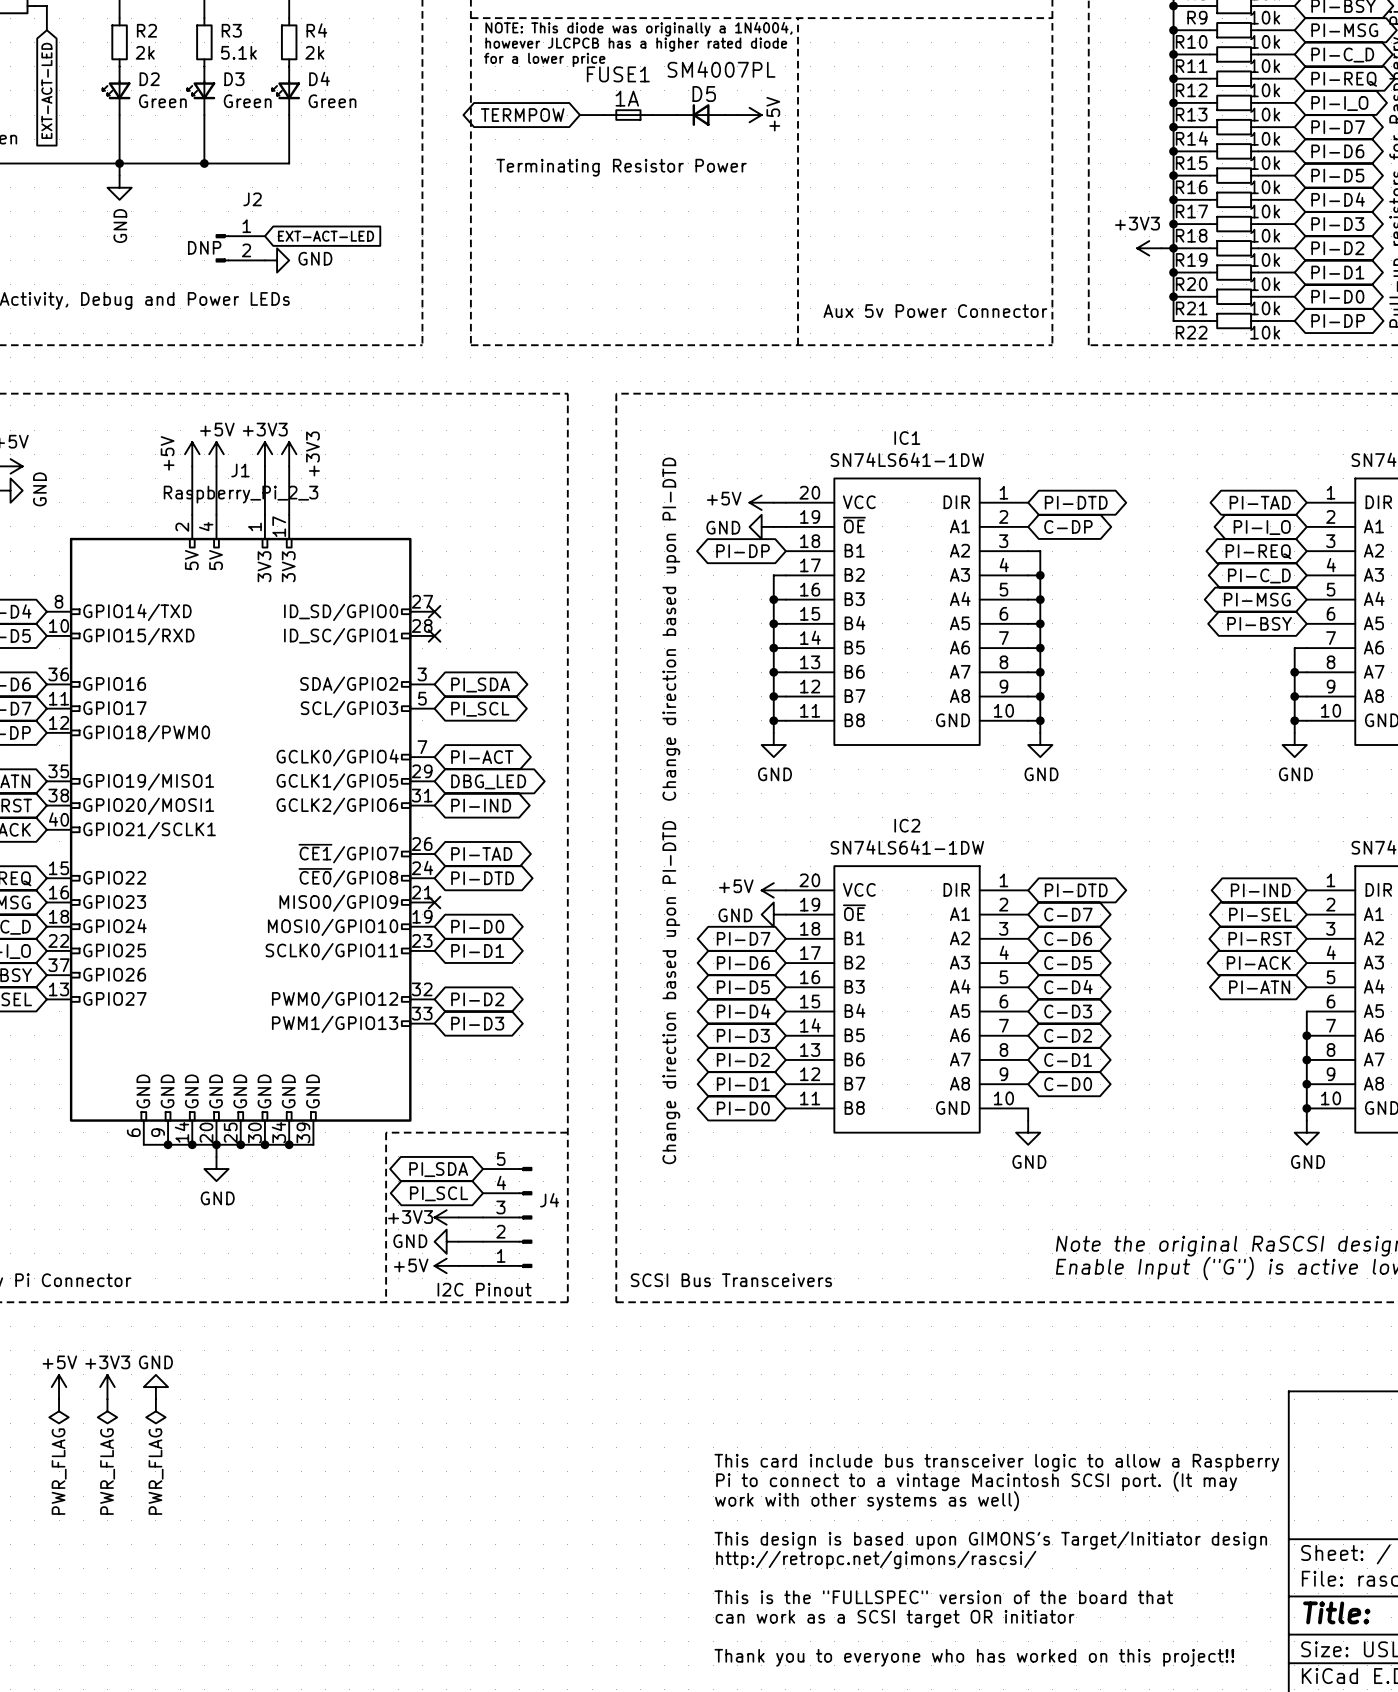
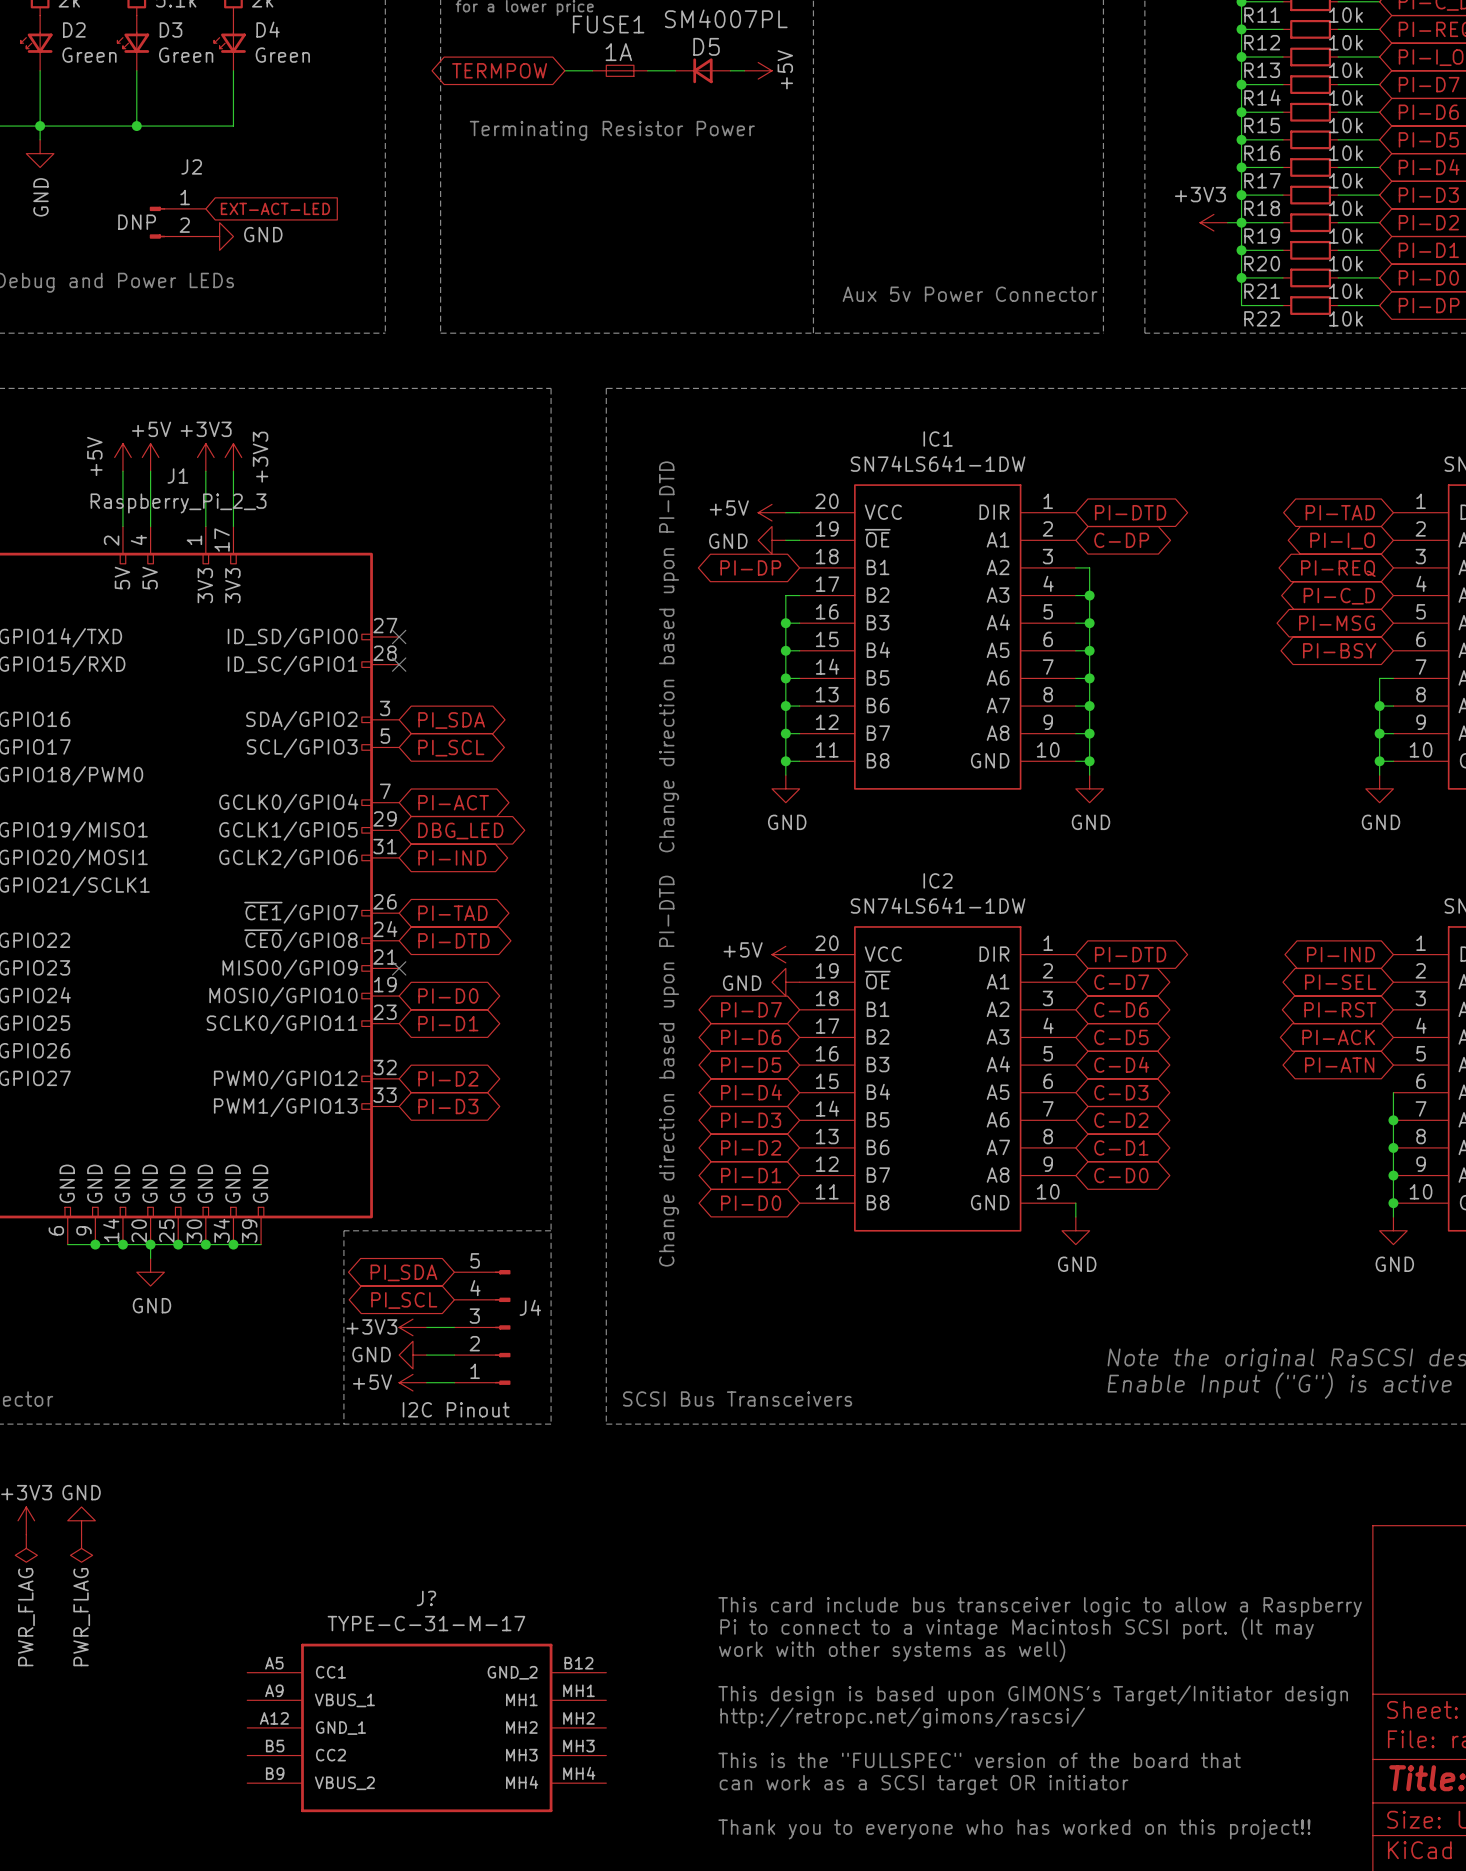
J?: none -> TYPE-C-31-M-17 (426, 1727)

